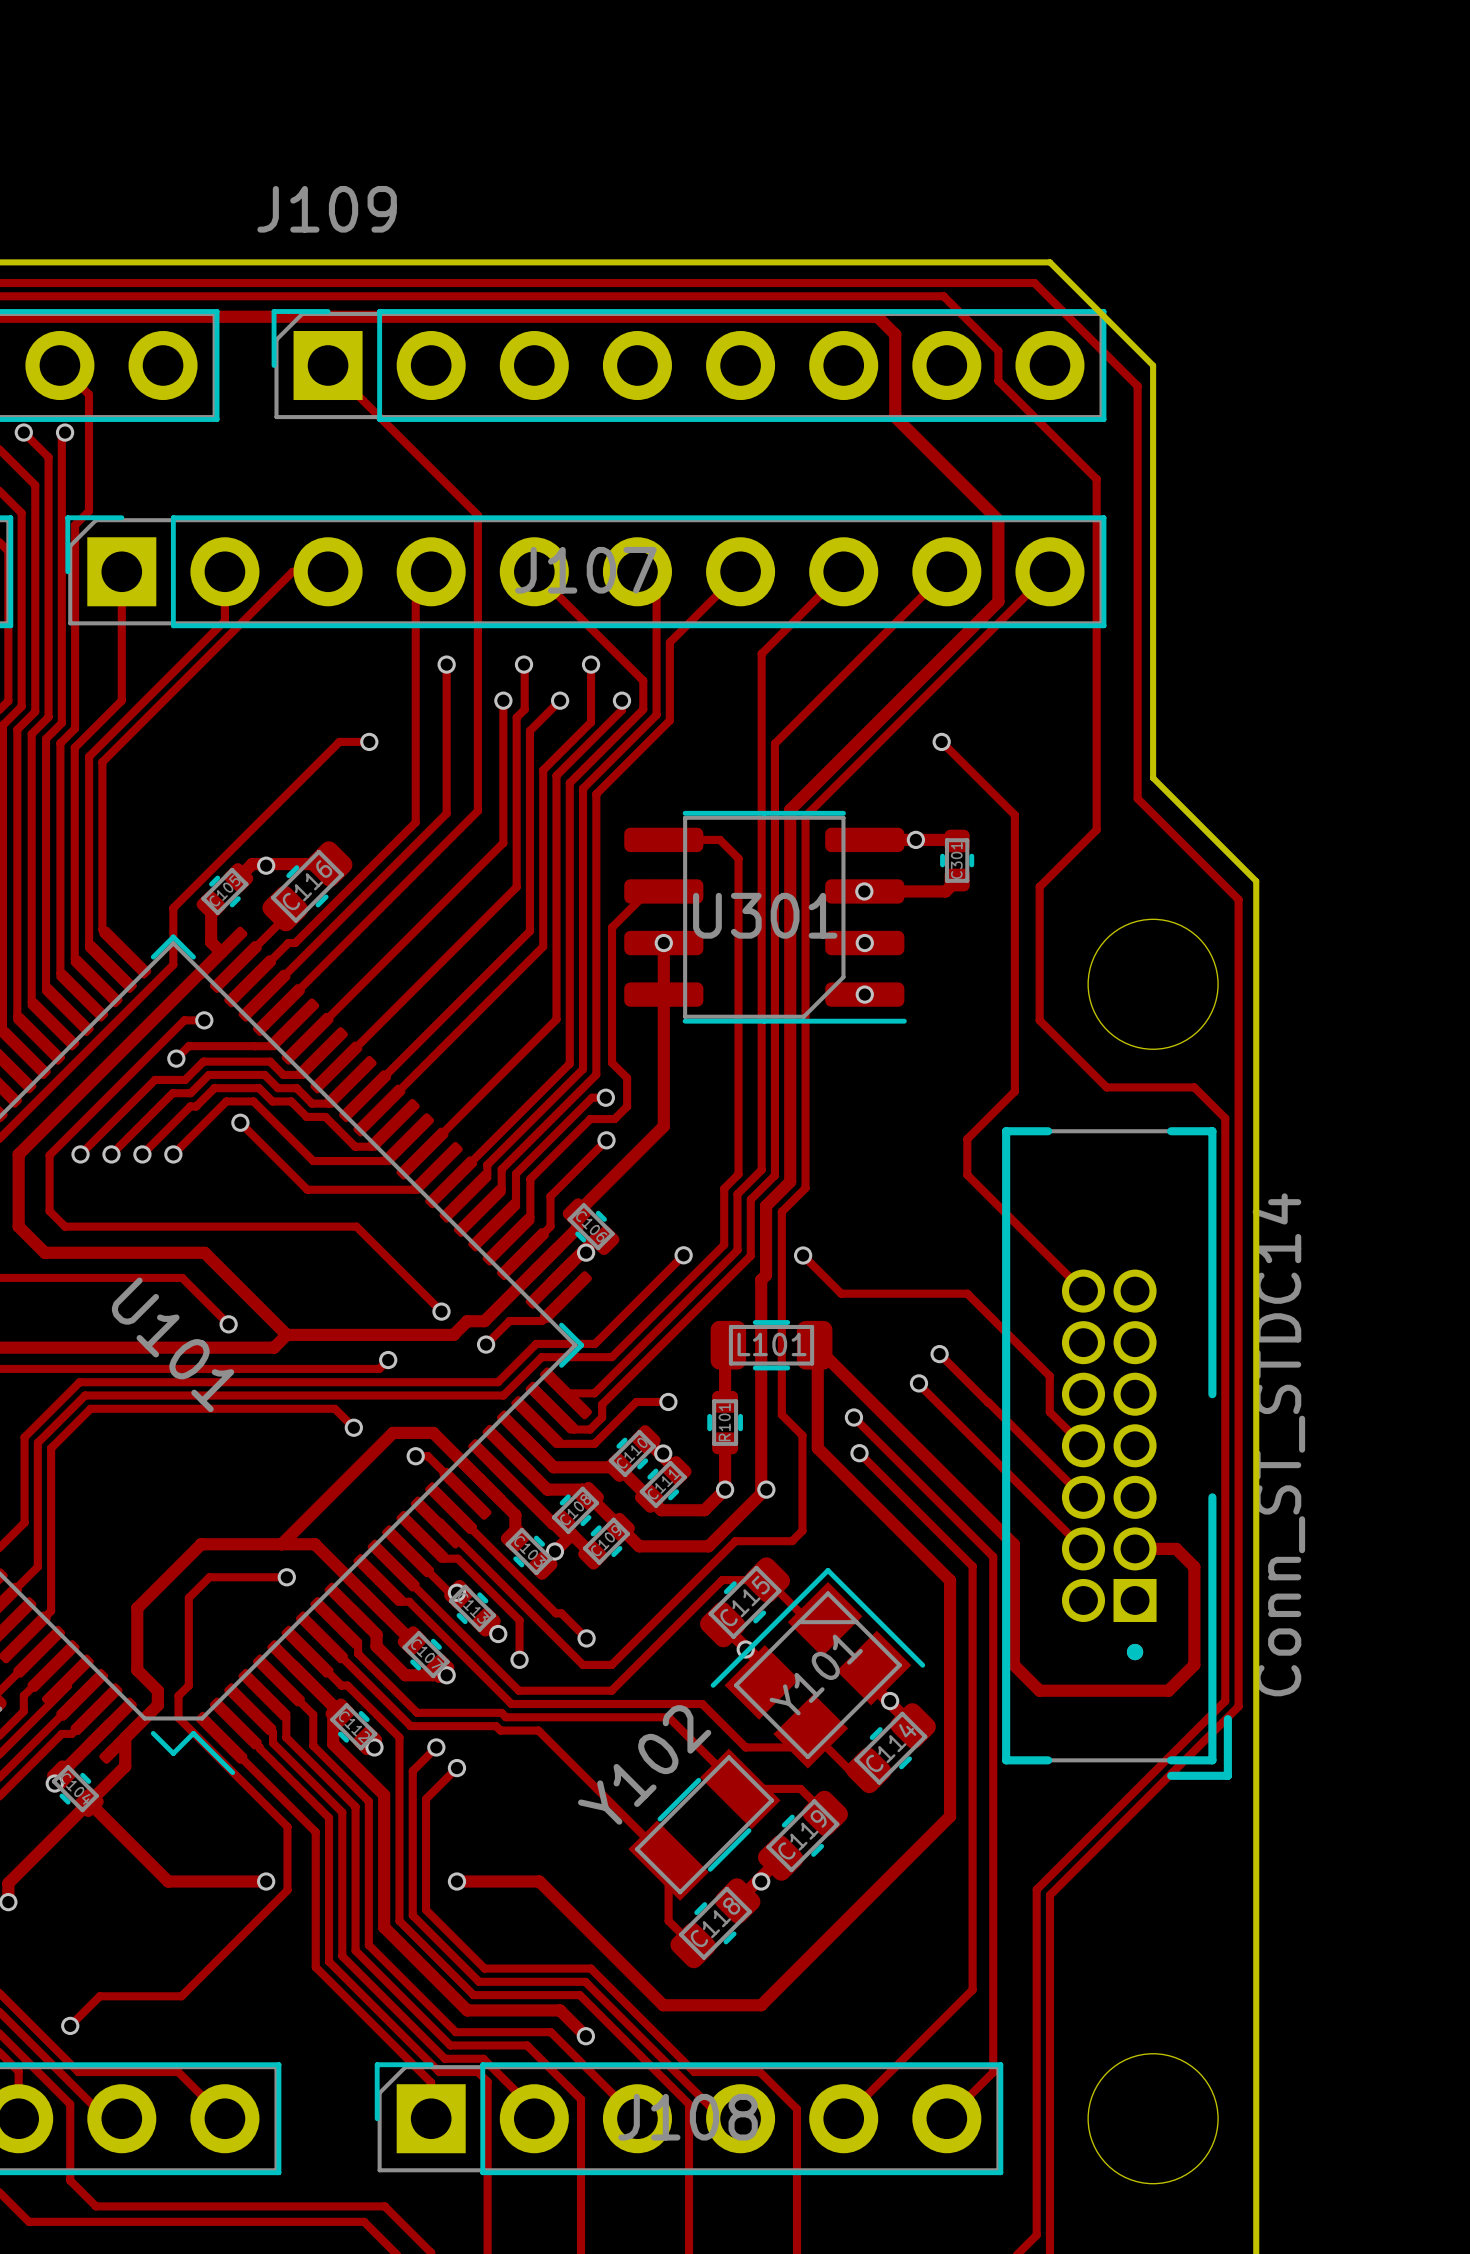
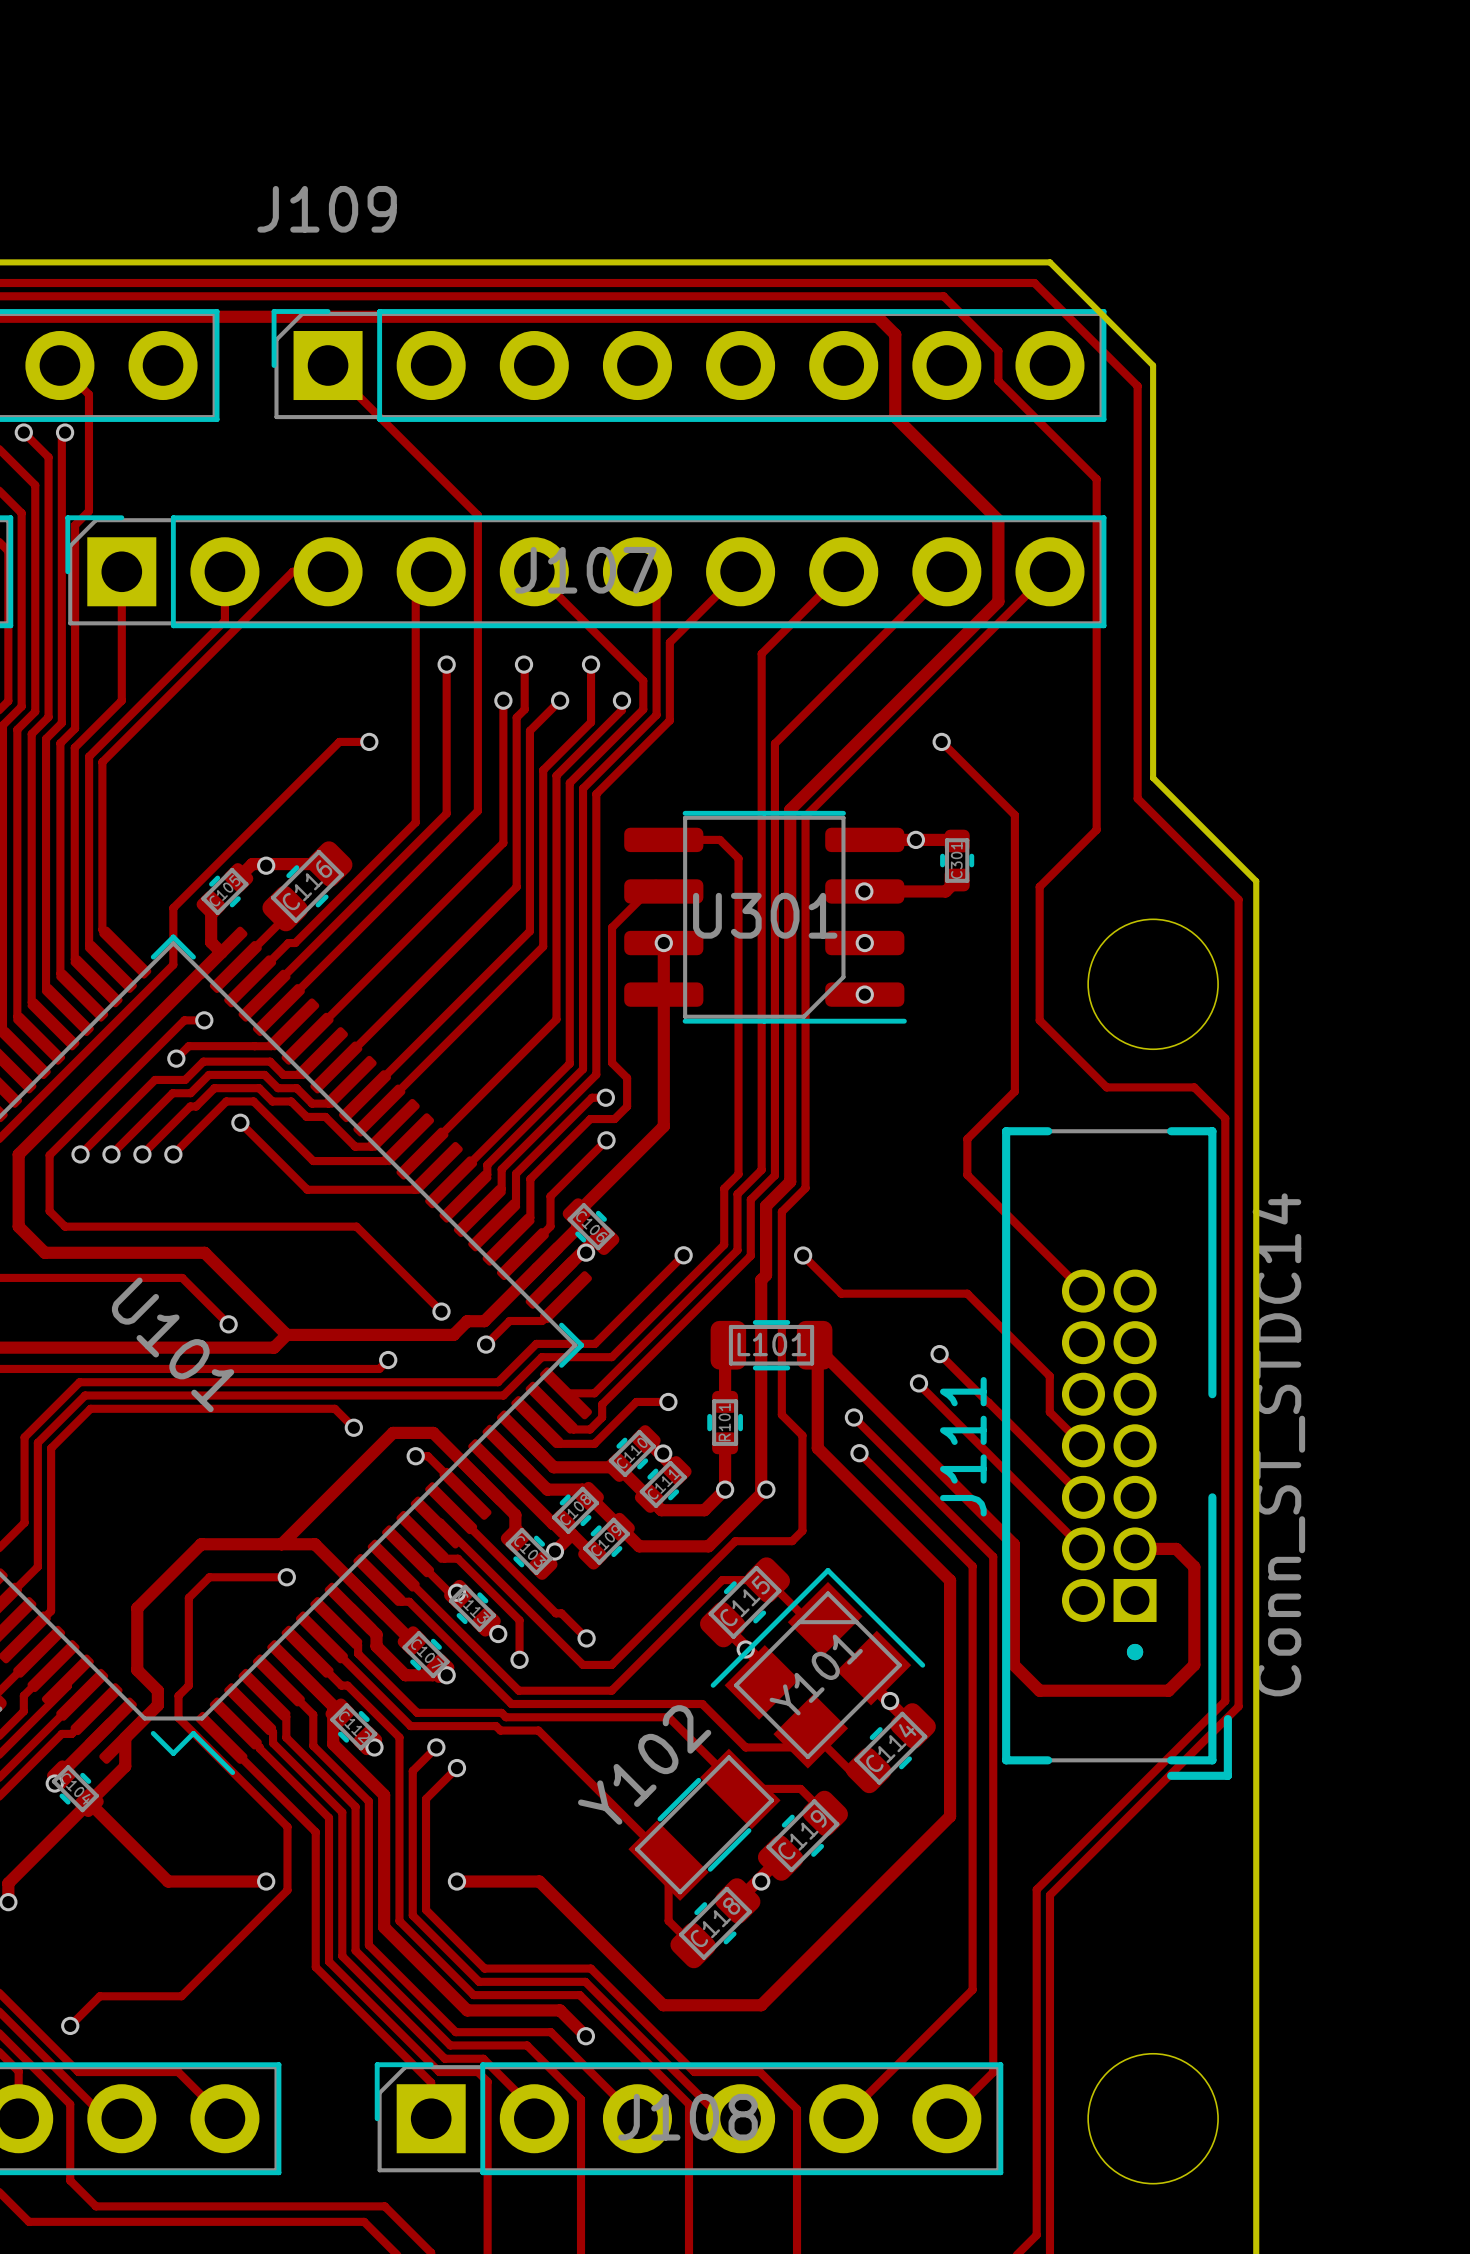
J111 name: none -> J111 (963, 1446)

